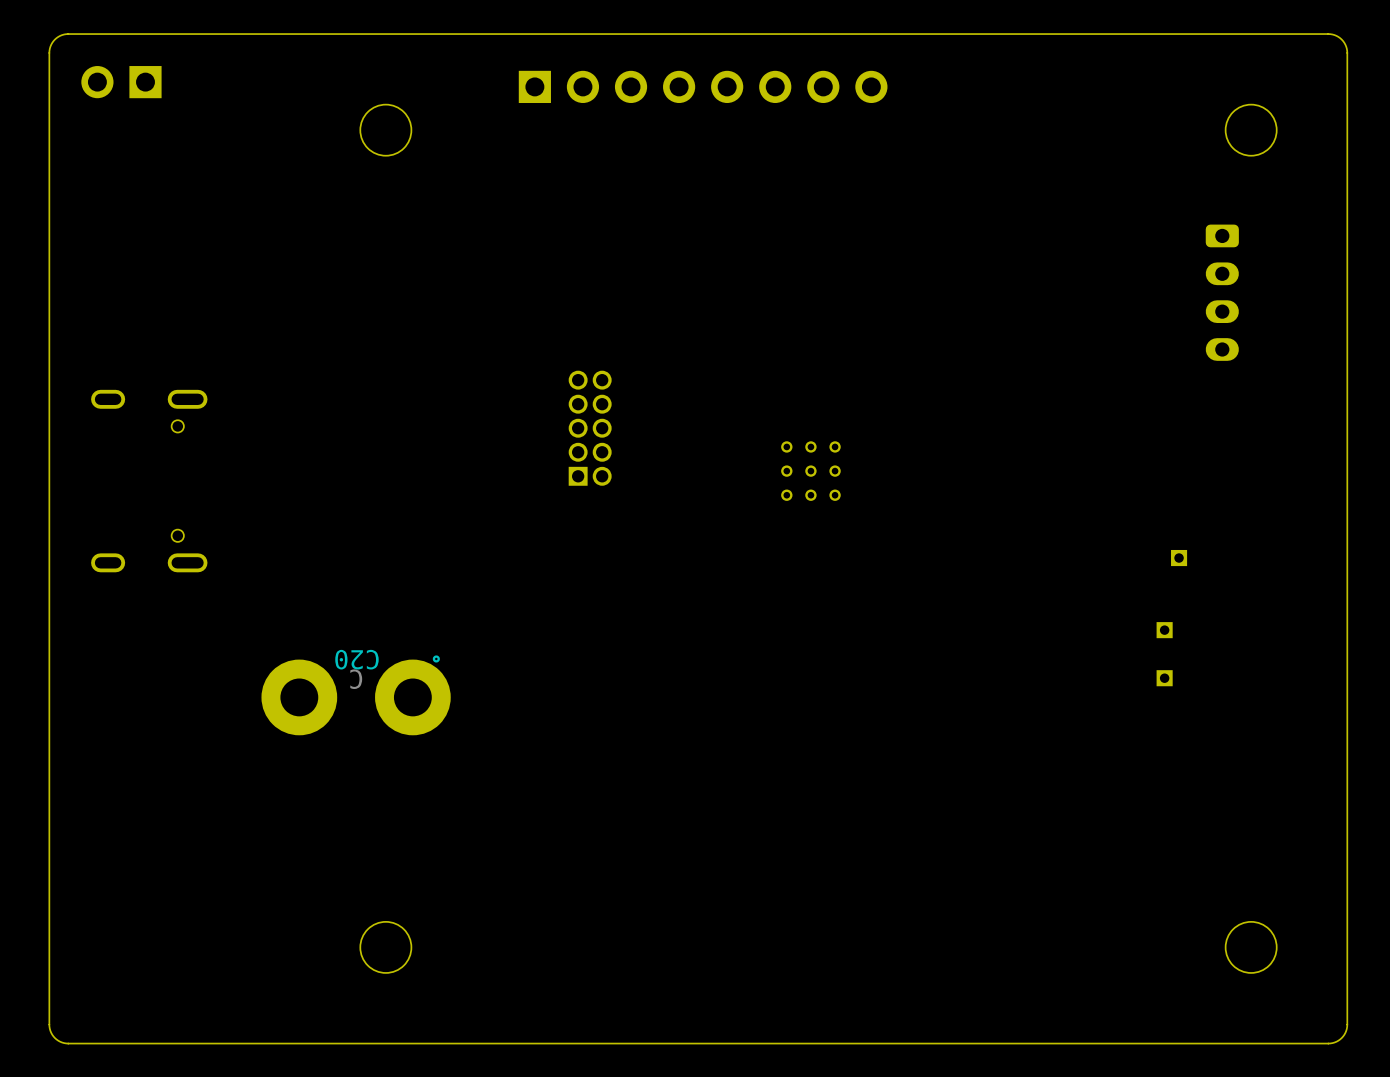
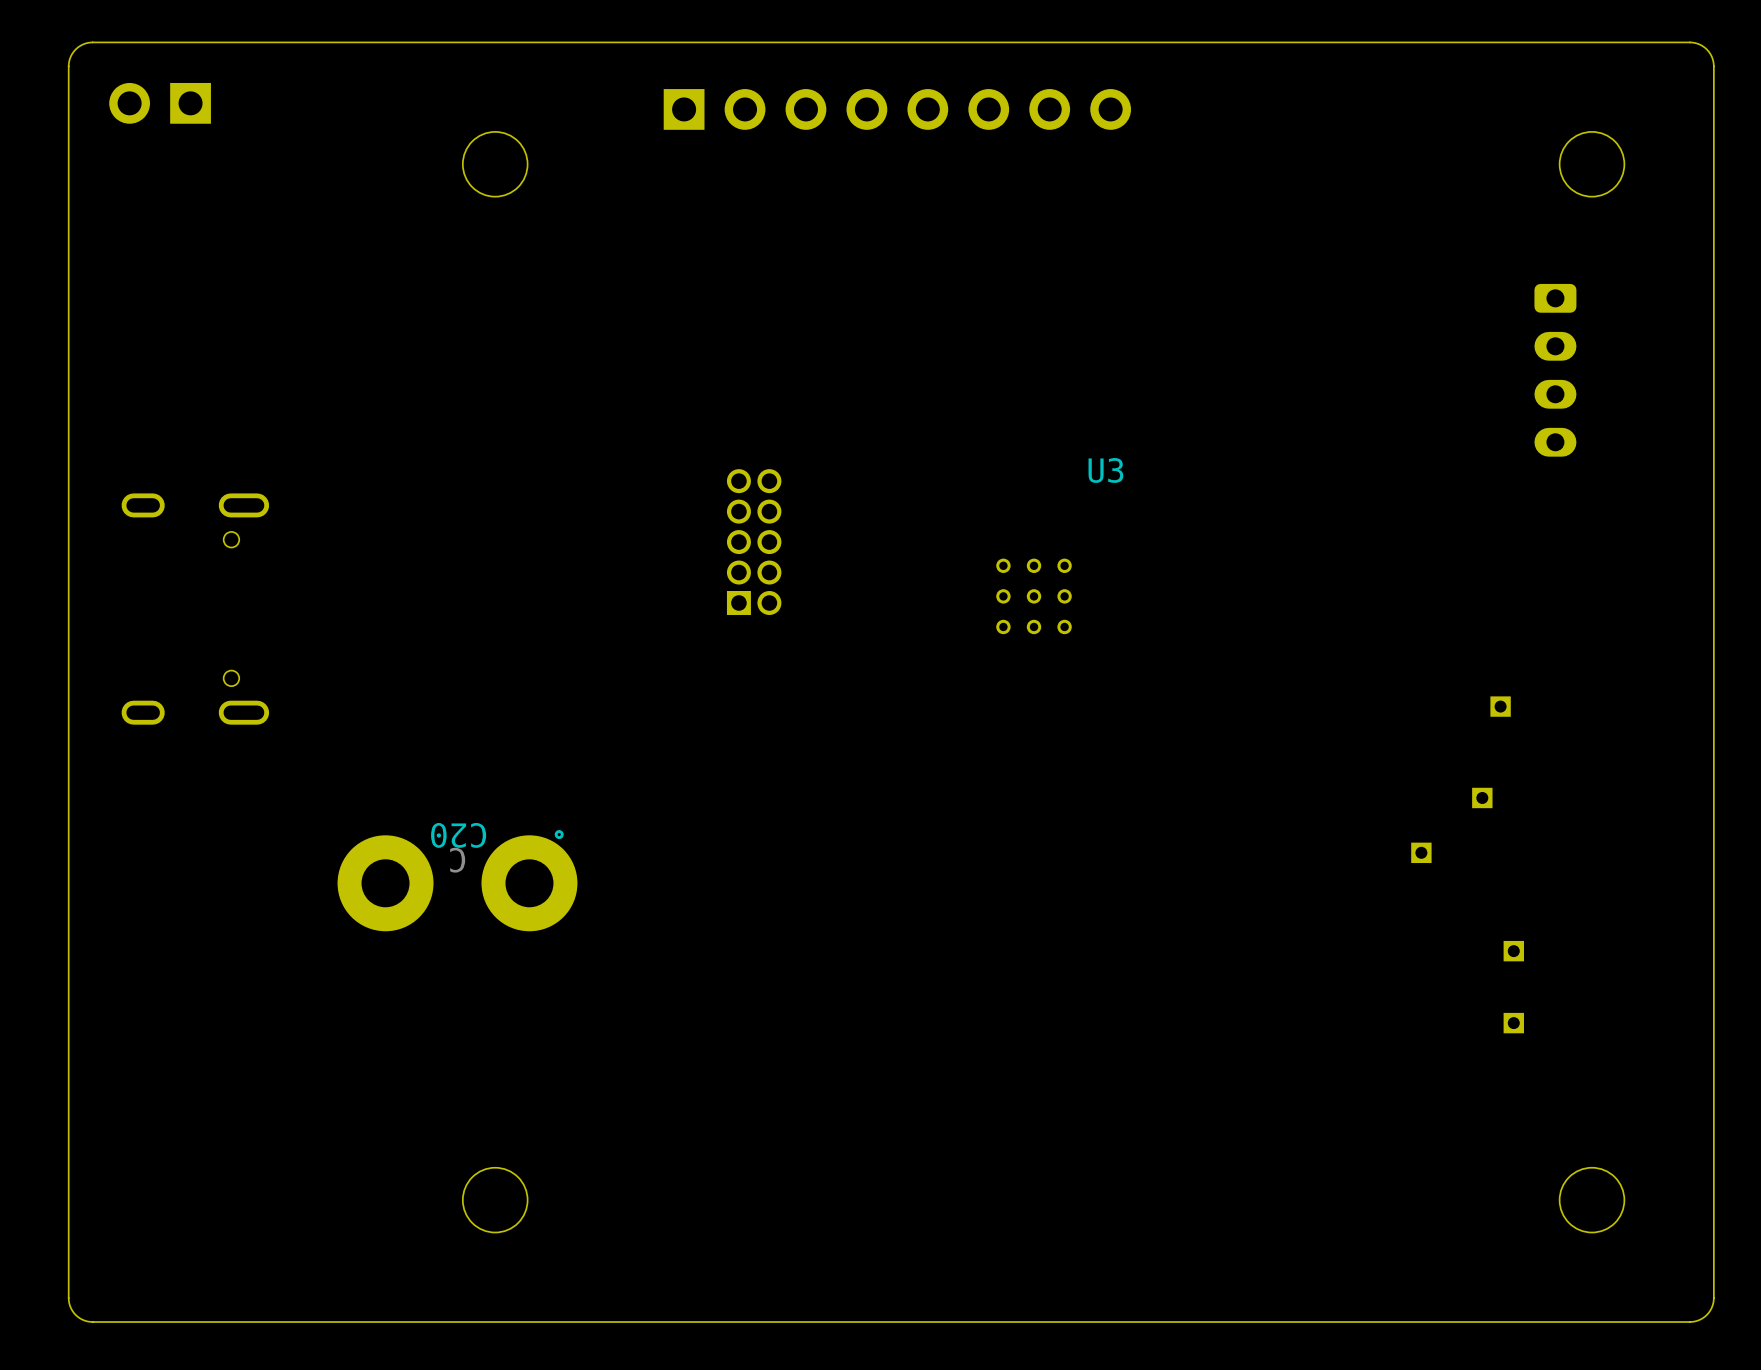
U3 name: none -> U3 (1105, 470)
part: none -> (1421, 852)
part: (1164, 678) -> none
part: none -> (1513, 951)
part: none -> (1513, 1023)

